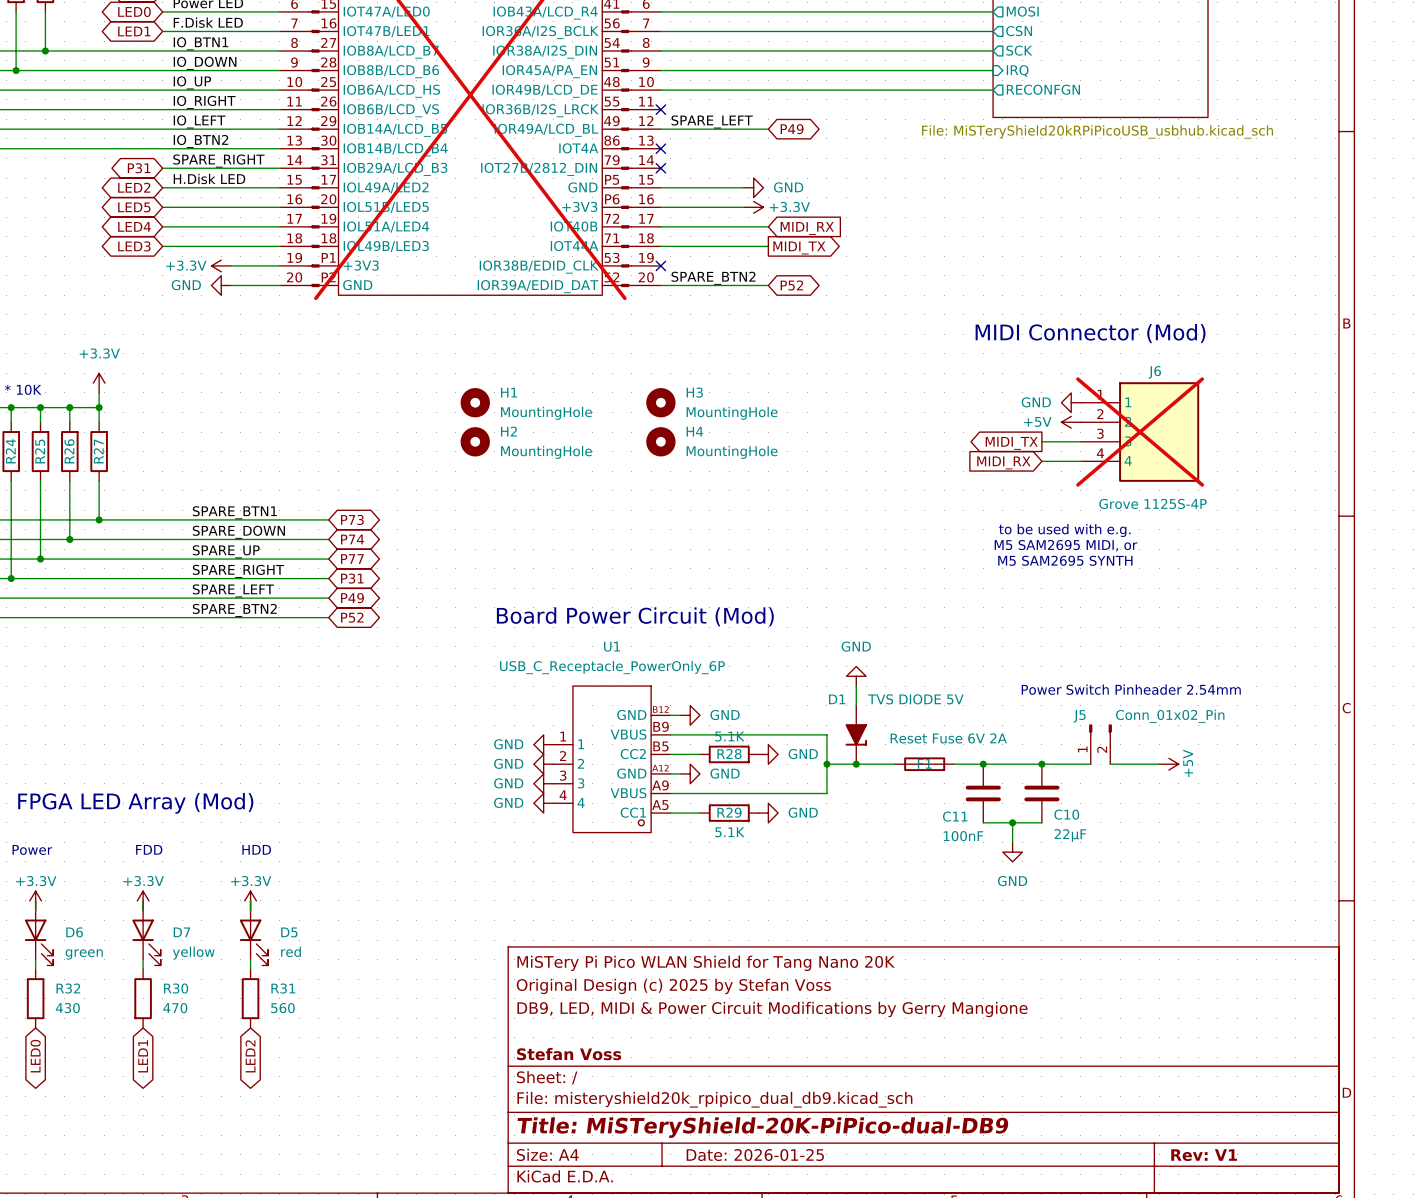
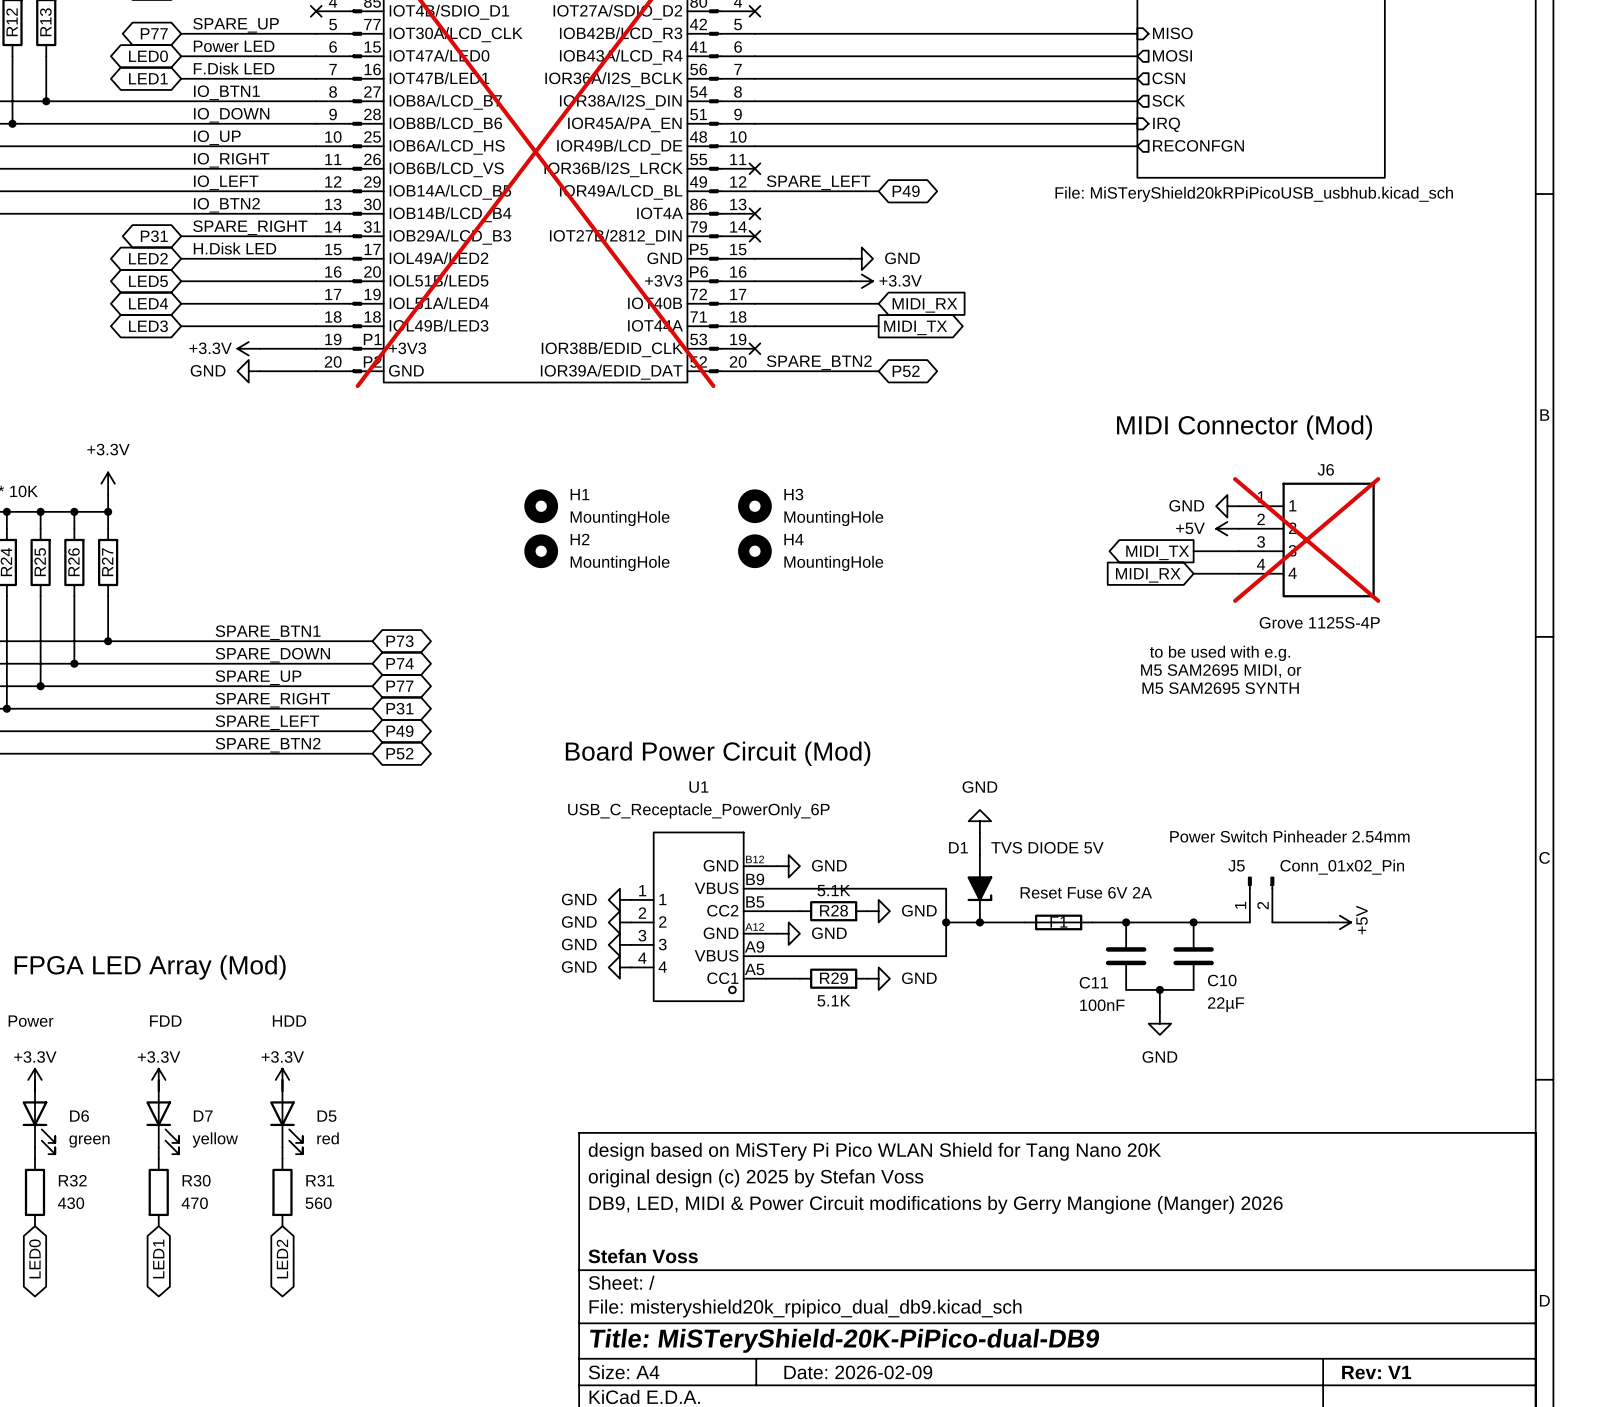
title block: MiSTery Pi Pico WLAN Shield for Tang Nano 20K (706, 963) -> design based on MiSTery Pi Pico WLAN Shield for Tang Nano 20K (874, 1151)
title block: Original Design (c) 2025 by Stefan Voss (673, 986) -> original design (c) 2025 by Stefan Voss (756, 1178)
title block: DB9, LED, MIDI & Power Circuit Modifications by Gerry Mangione (772, 1009) -> DB9, LED, MIDI & Power Circuit modifications by Gerry Mangione (Manger) 2026 (936, 1204)
title block: Date: 2026-01-25 (755, 1155) -> Date: 2026-02-09 (858, 1372)

